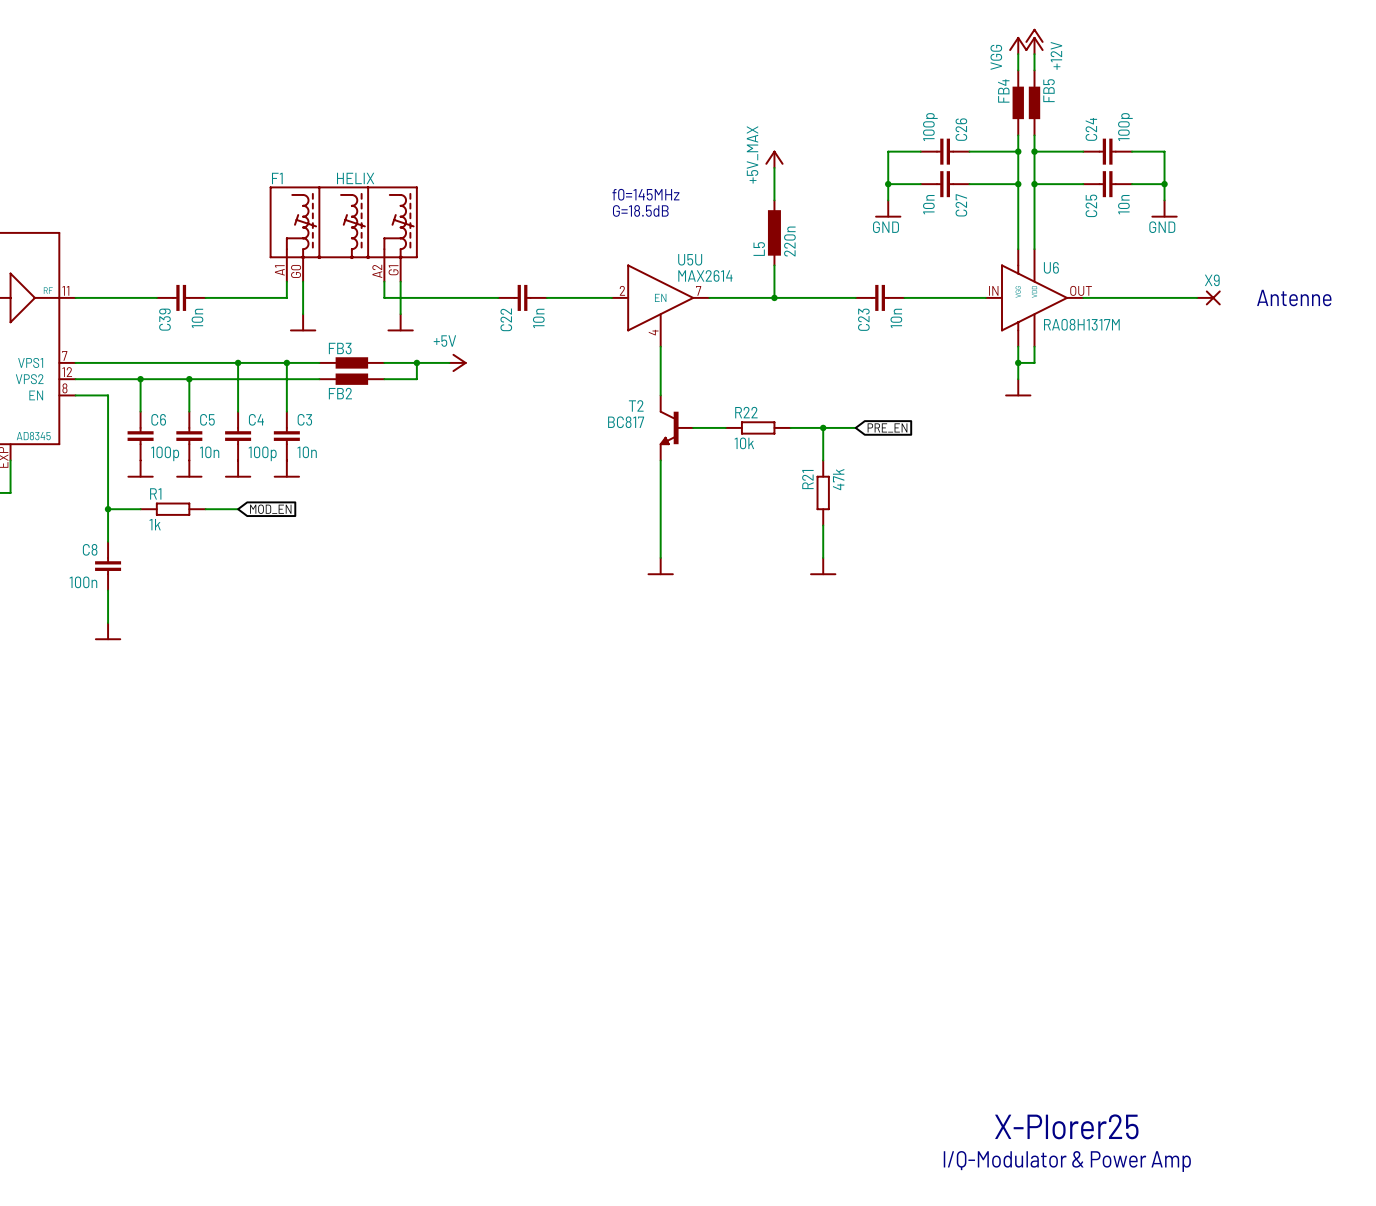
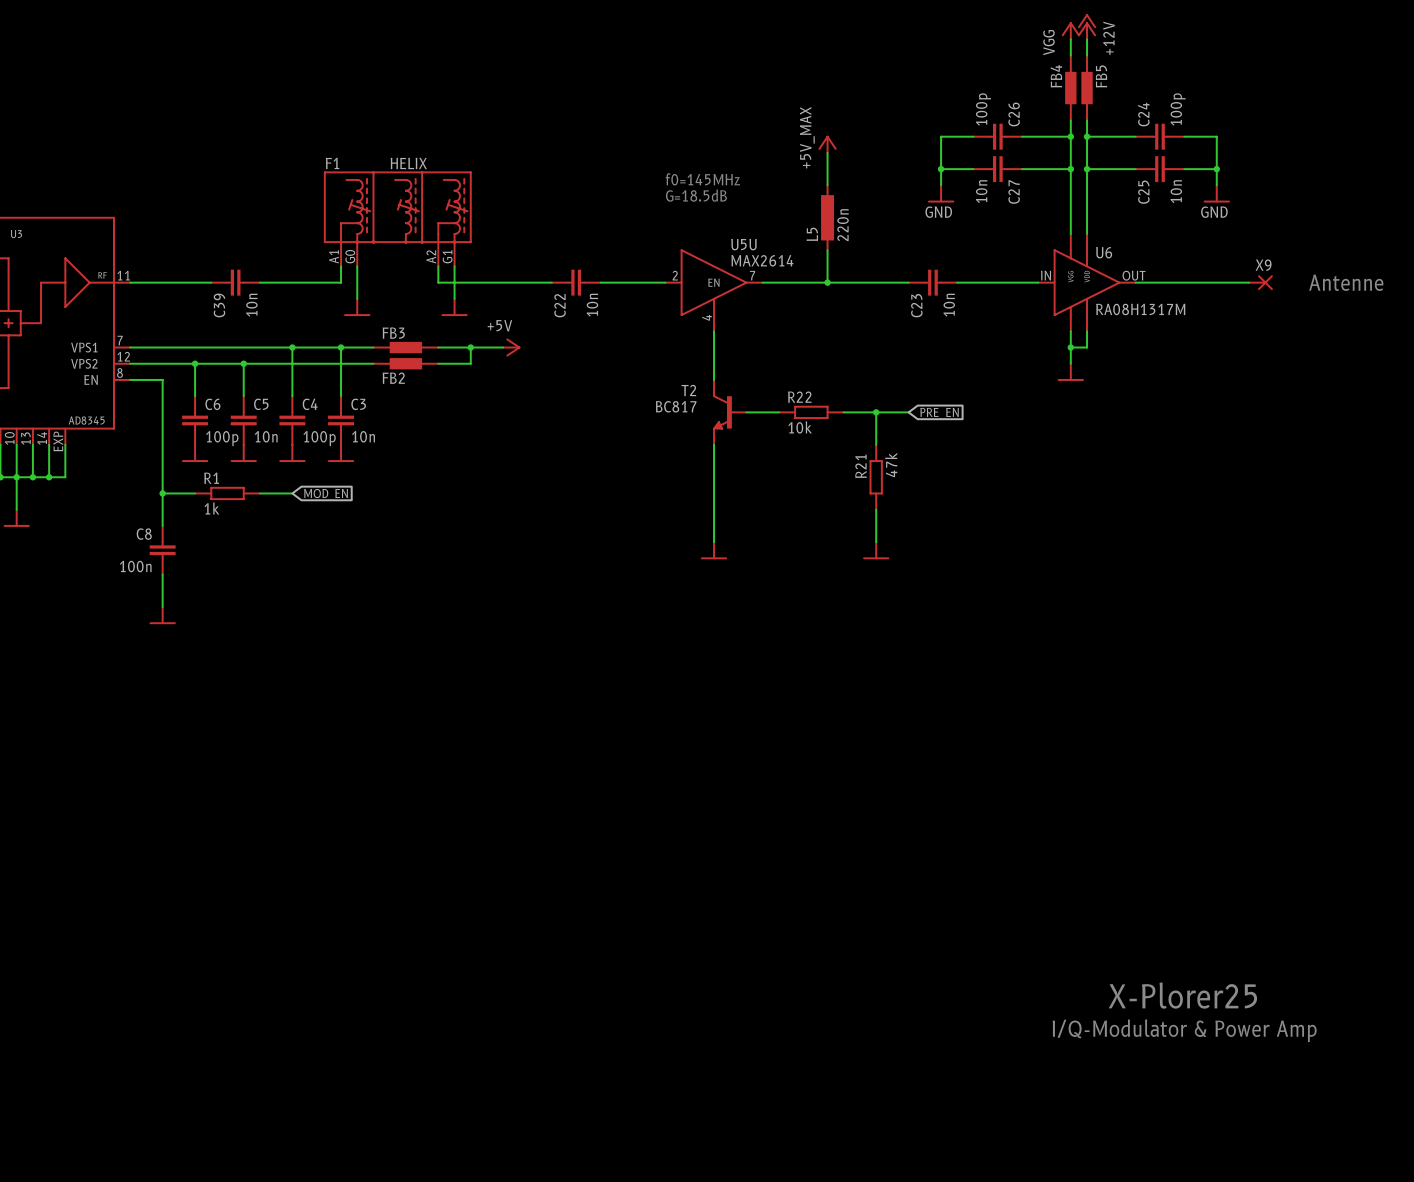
text position: X-Plorer25 (1066, 1126) -> X-Plorer25 (1182, 995)
text position: I/Q-Modulator & Power Amp (1067, 1161) -> I/Q-Modulator & Power Amp (1184, 1030)

